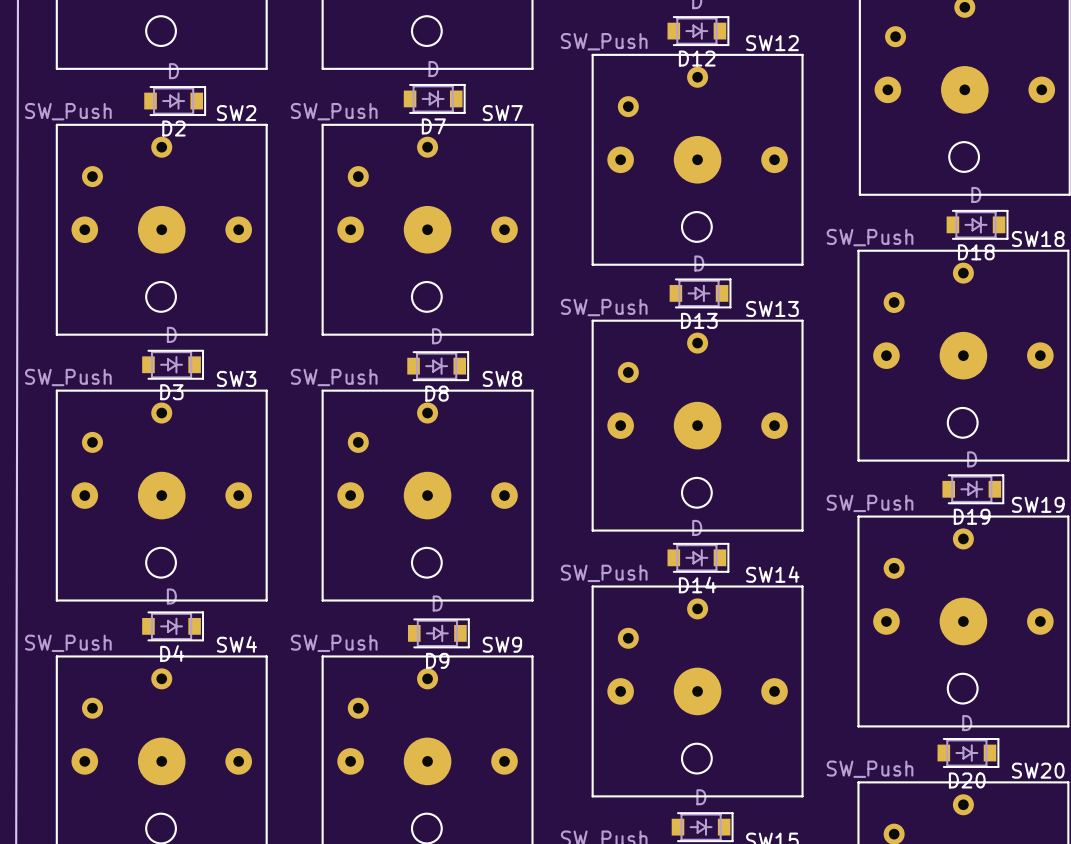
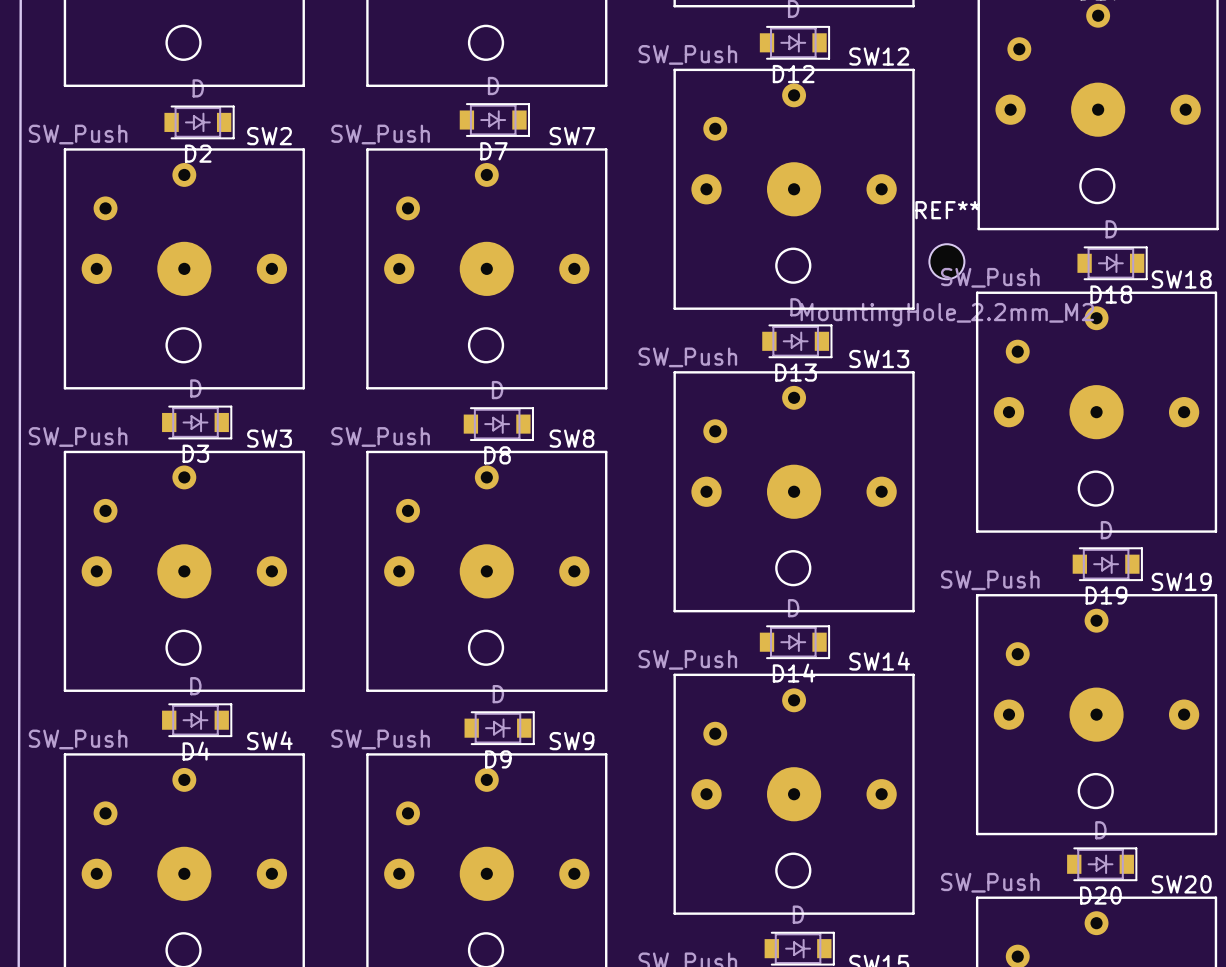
REF**: none -> MountingHole_2.2mm_M2 (946, 261)

